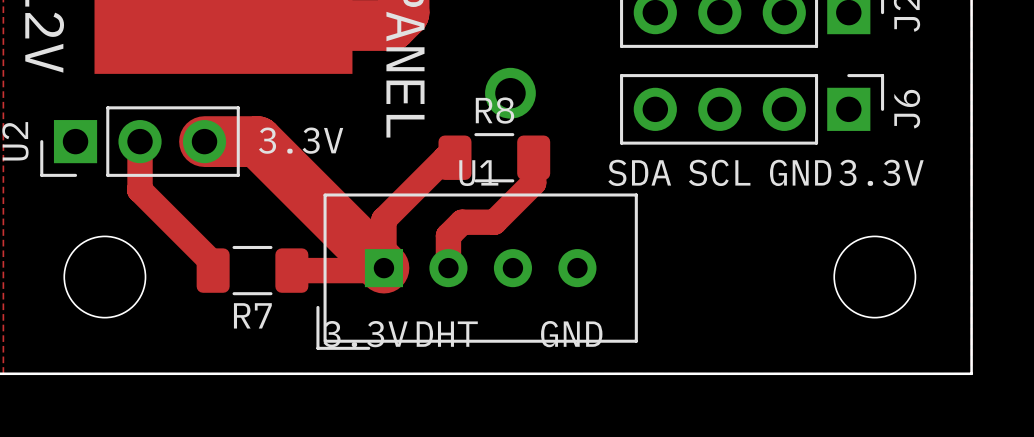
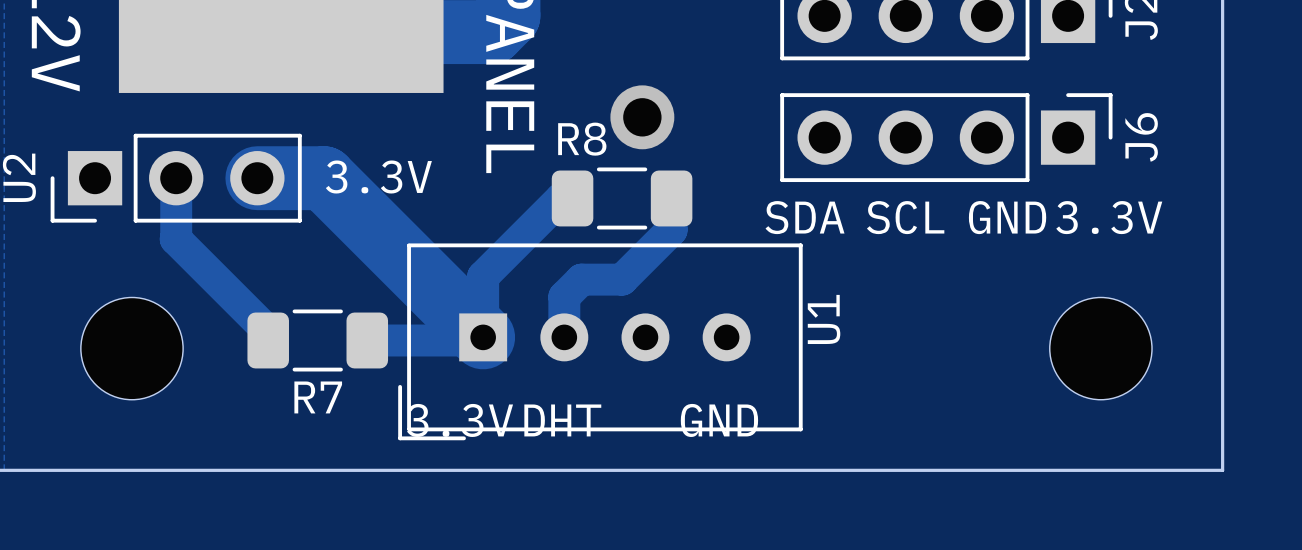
R8 name position: R8 (494, 110) -> R8 (582, 139)
U1 name rotation: 0° (478, 173) -> 90° counterclockwise (824, 319)
U1 name position: U1 (478, 173) -> U1 (824, 319)

